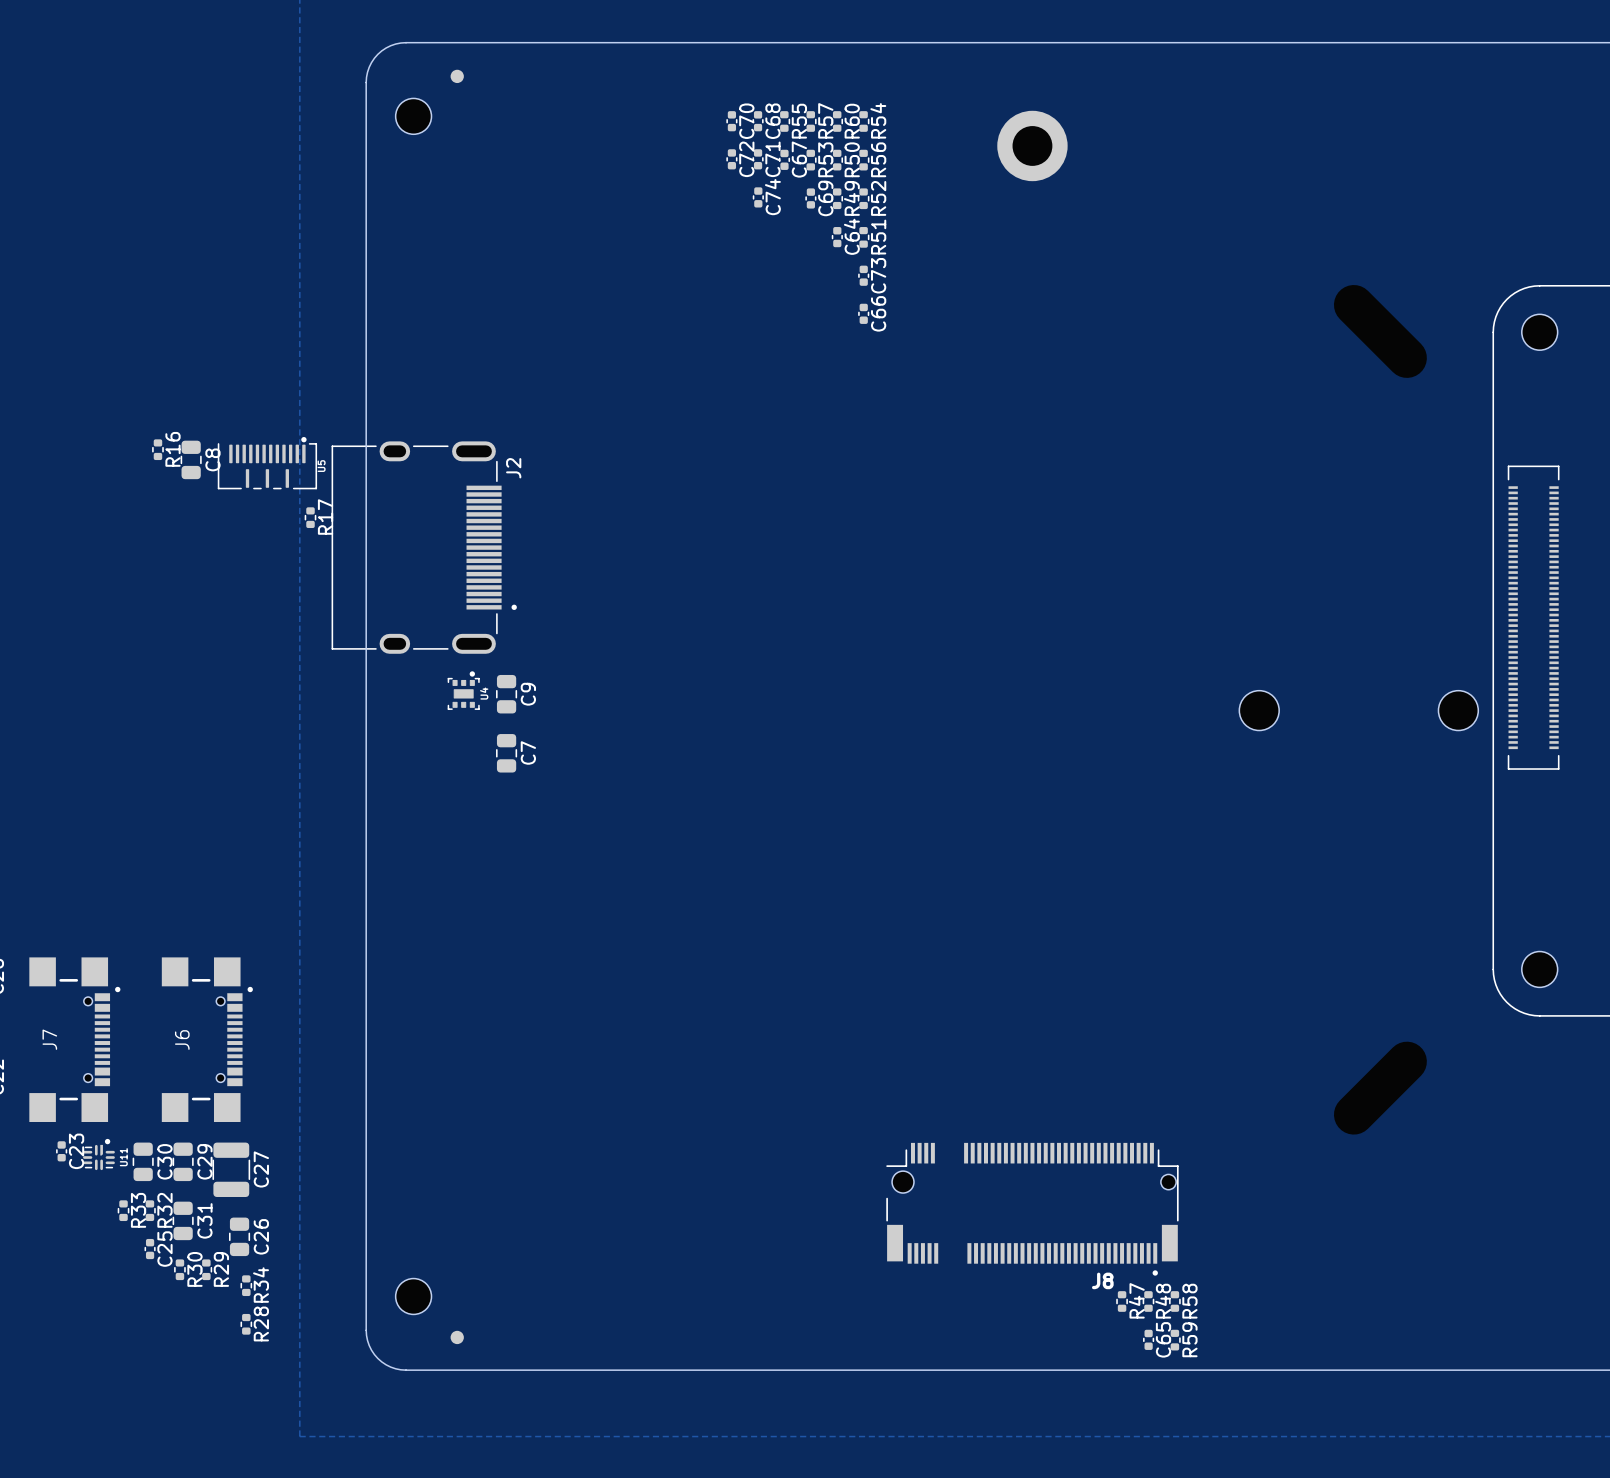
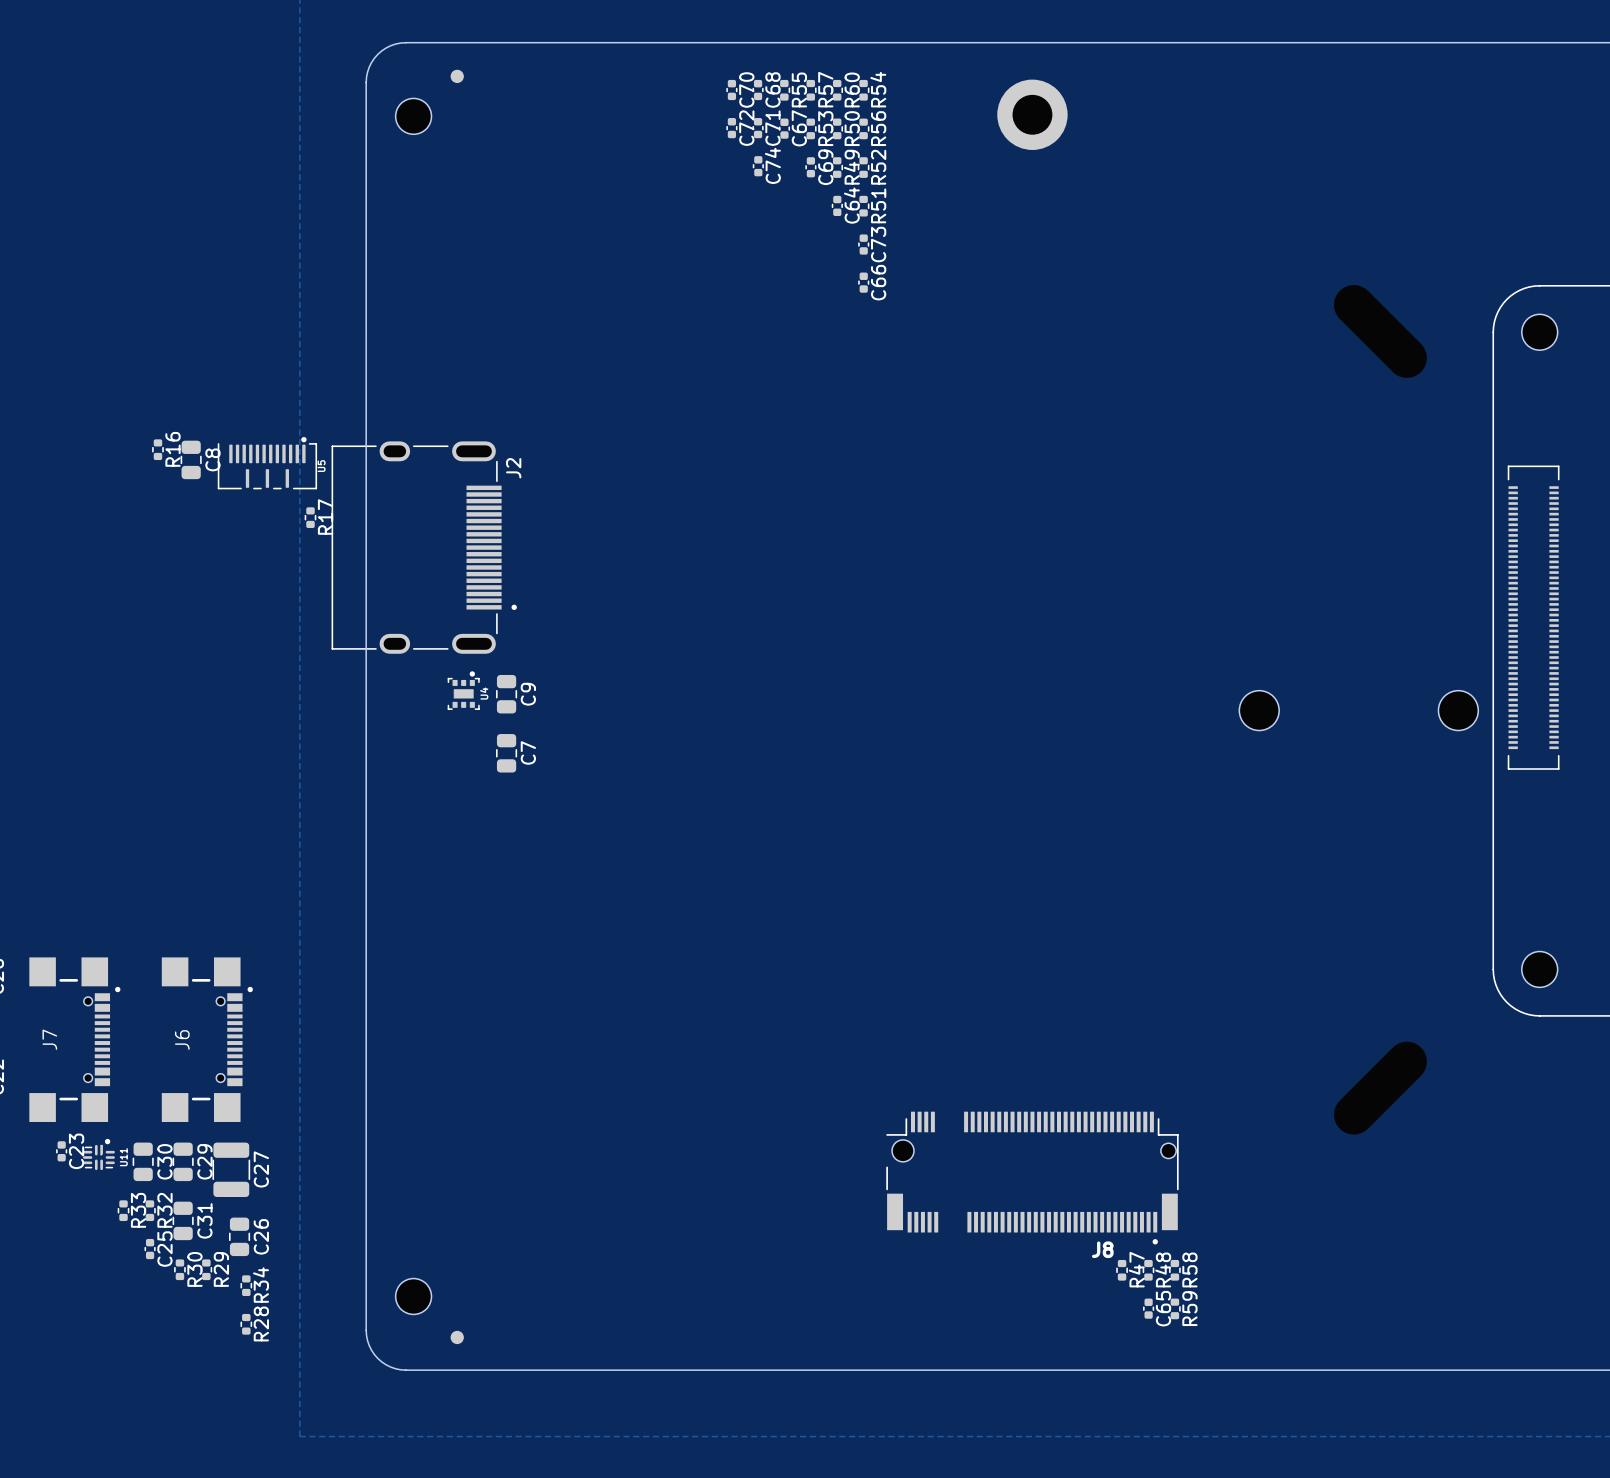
C70 position: (731, 121) -> (731, 90)
C68 position: (758, 121) -> (758, 90)
R55 position: (784, 121) -> (784, 90)
R57 position: (810, 121) -> (810, 90)
R60 position: (837, 121) -> (837, 90)
R54 position: (863, 121) -> (863, 90)
C72 position: (731, 159) -> (731, 128)
C71 position: (758, 159) -> (758, 128)
C67 position: (784, 159) -> (784, 128)
R53 position: (810, 160) -> (810, 128)
R50 position: (837, 160) -> (837, 128)
R56 position: (863, 160) -> (863, 128)
C74 position: (758, 197) -> (758, 166)
C69 position: (810, 198) -> (810, 167)
R49 position: (837, 198) -> (837, 167)
R52 position: (863, 198) -> (863, 167)
C64 position: (837, 237) -> (837, 205)
R51 position: (863, 237) -> (863, 206)
C73 position: (863, 275) -> (863, 244)
C66 position: (863, 313) -> (863, 282)
J8 position: (1032, 693) -> (1032, 662)
R47 position: (1122, 1301) -> (1122, 1270)
R48 position: (1148, 1301) -> (1148, 1270)
R58 position: (1174, 1301) -> (1174, 1270)
C65 position: (1148, 1339) -> (1148, 1308)
R59 position: (1174, 1340) -> (1174, 1308)

